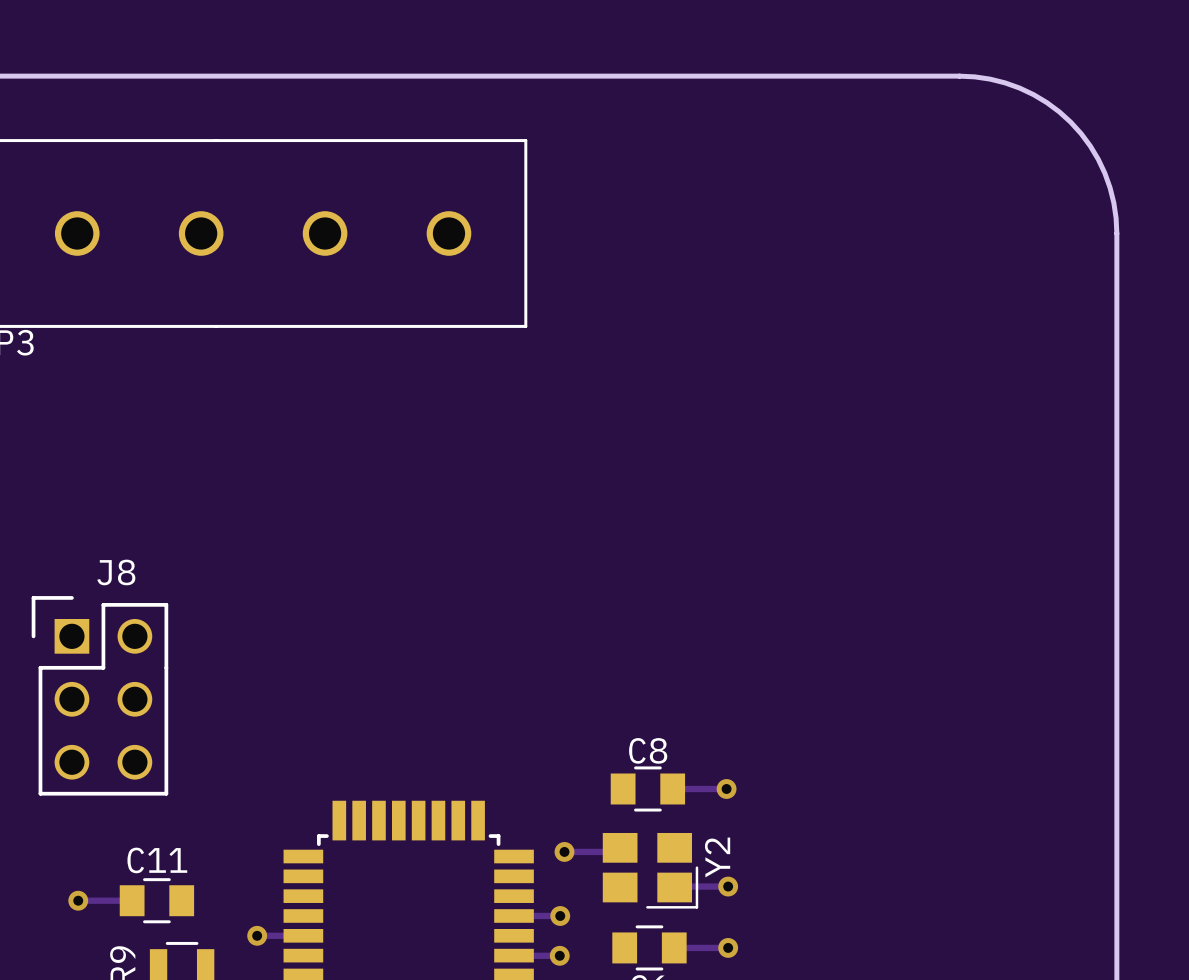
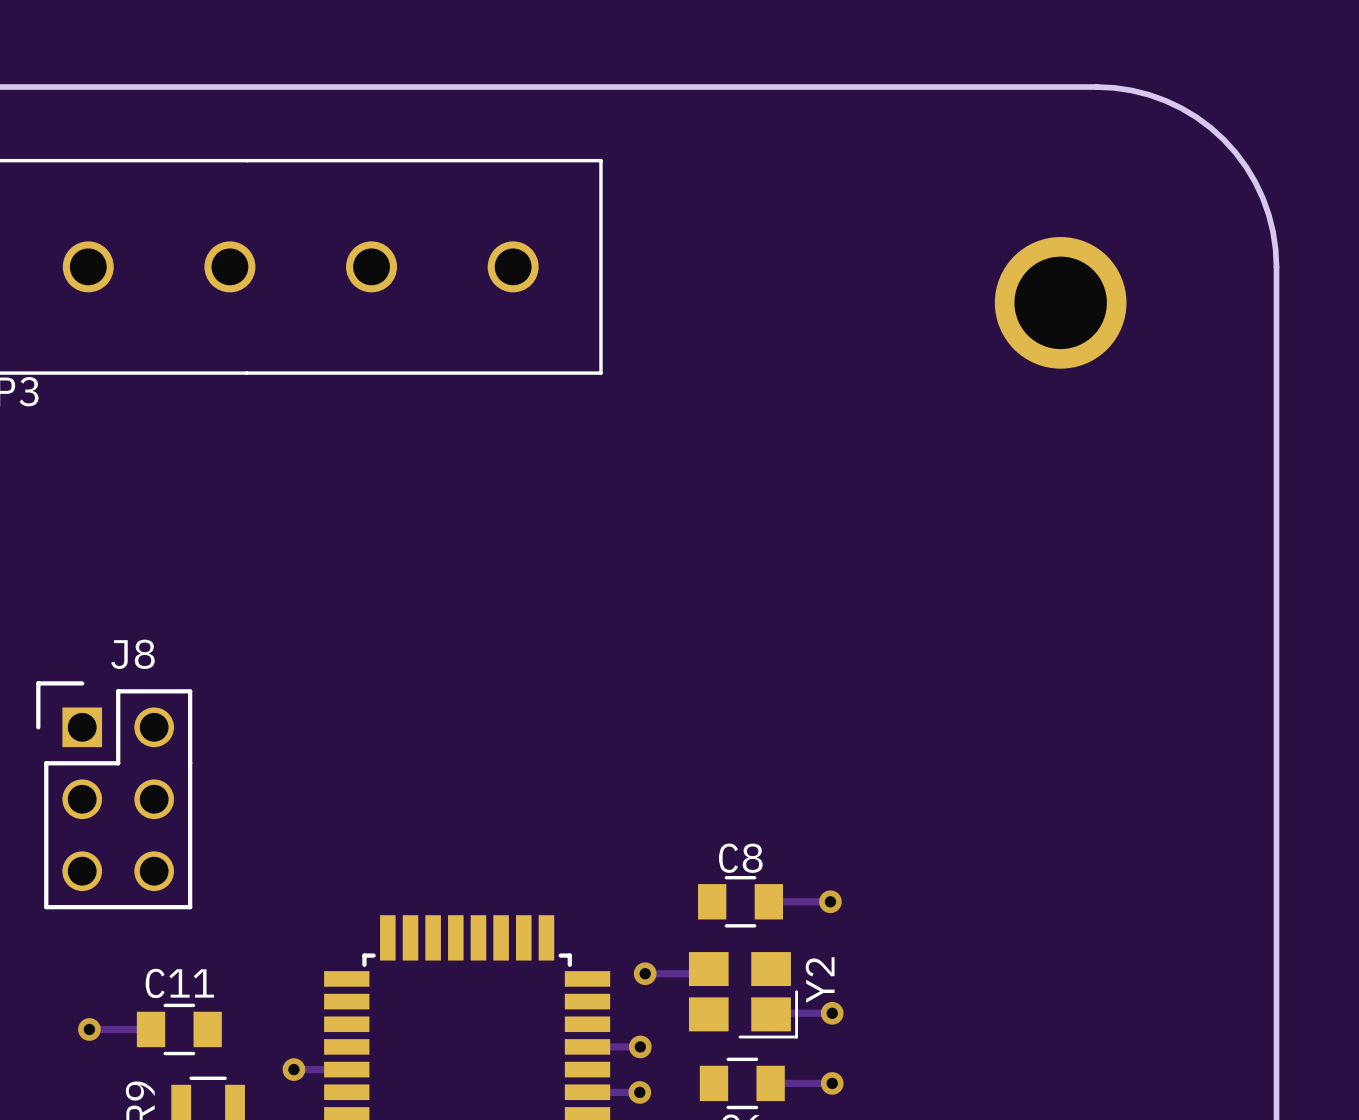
part: none -> (1060, 302)

